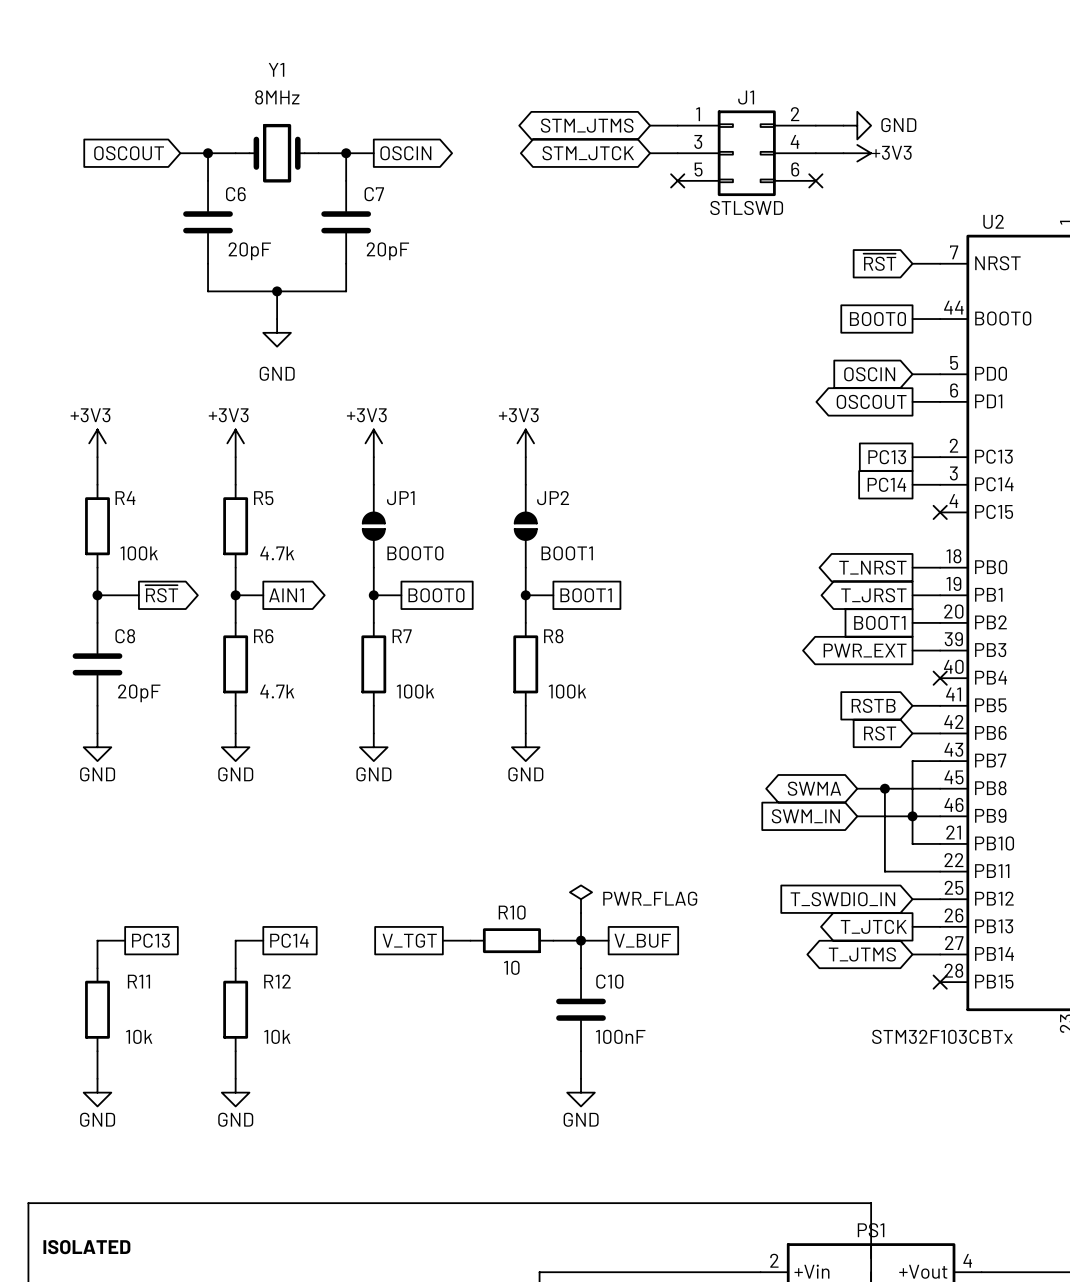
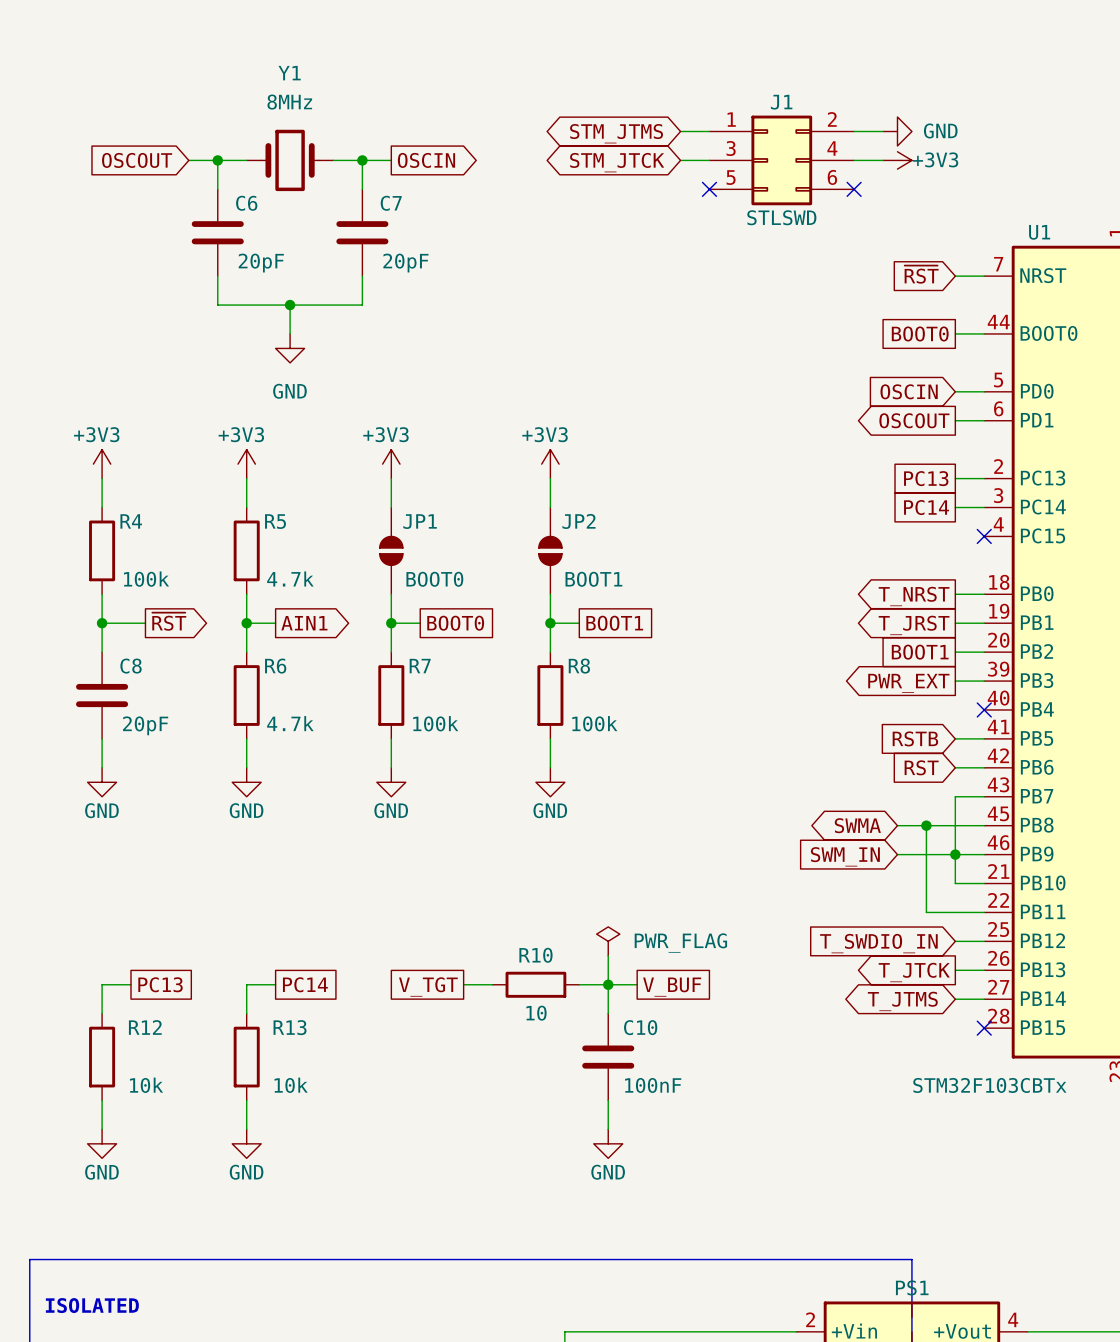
U2 name: U2 (993, 221) -> U1 (1039, 232)
R11 name: R11 (138, 981) -> R12 (145, 1027)
R12 name: R12 (277, 981) -> R13 (290, 1027)

